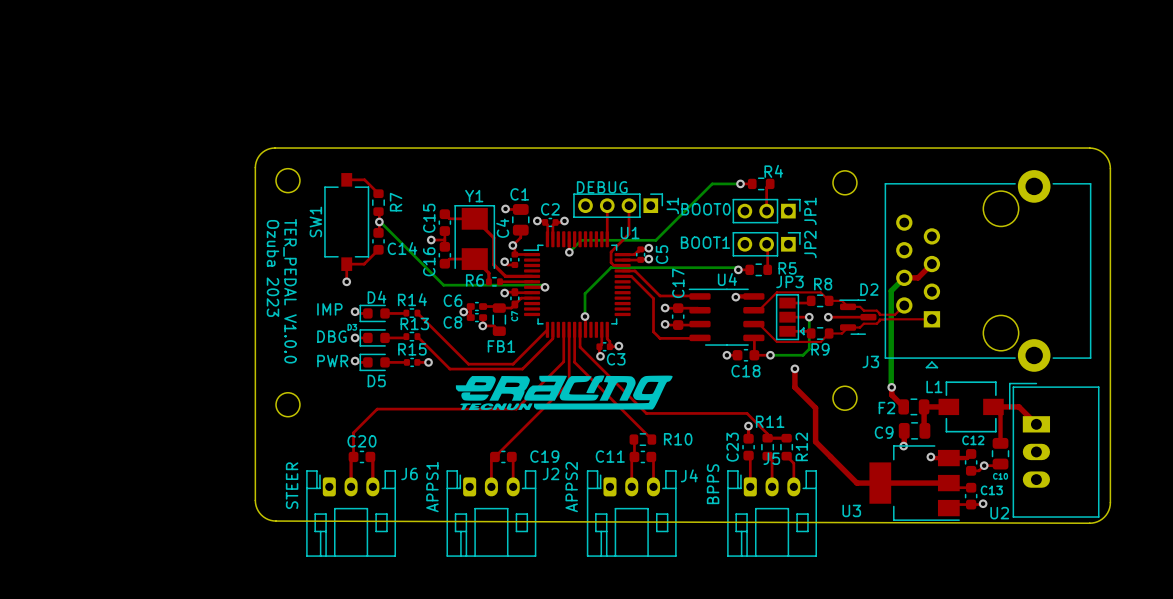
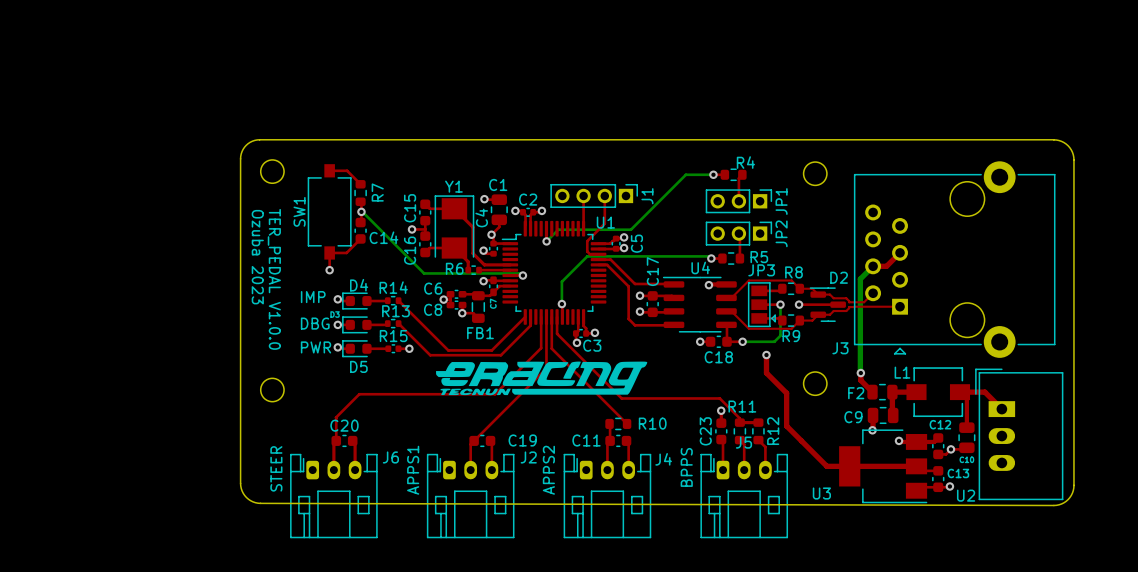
text: DEBUG (602, 187) -> none
text: BOOT0 (706, 209) -> none
text: BOOT1 (705, 242) -> none

